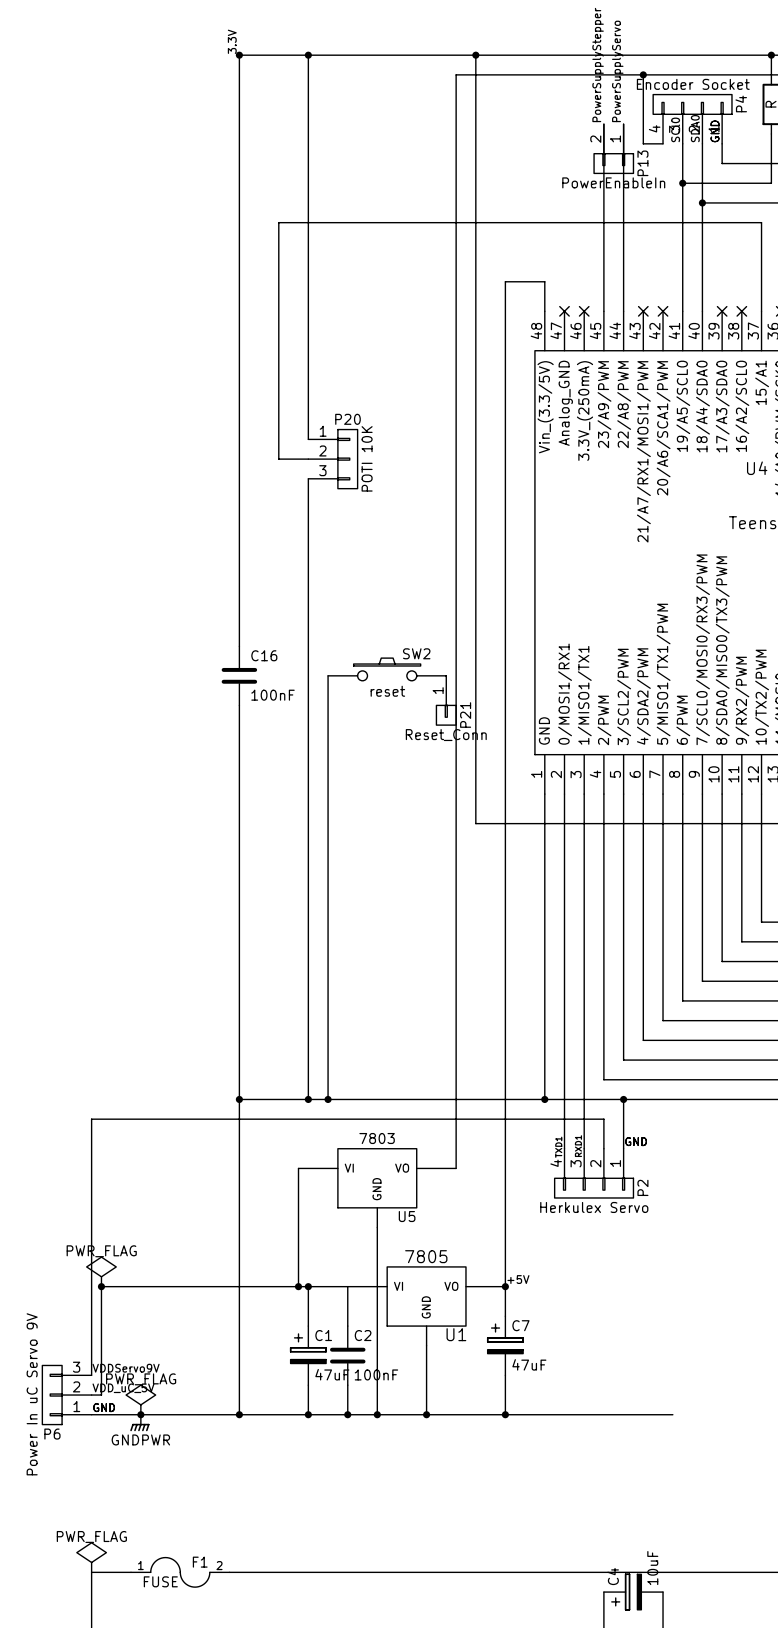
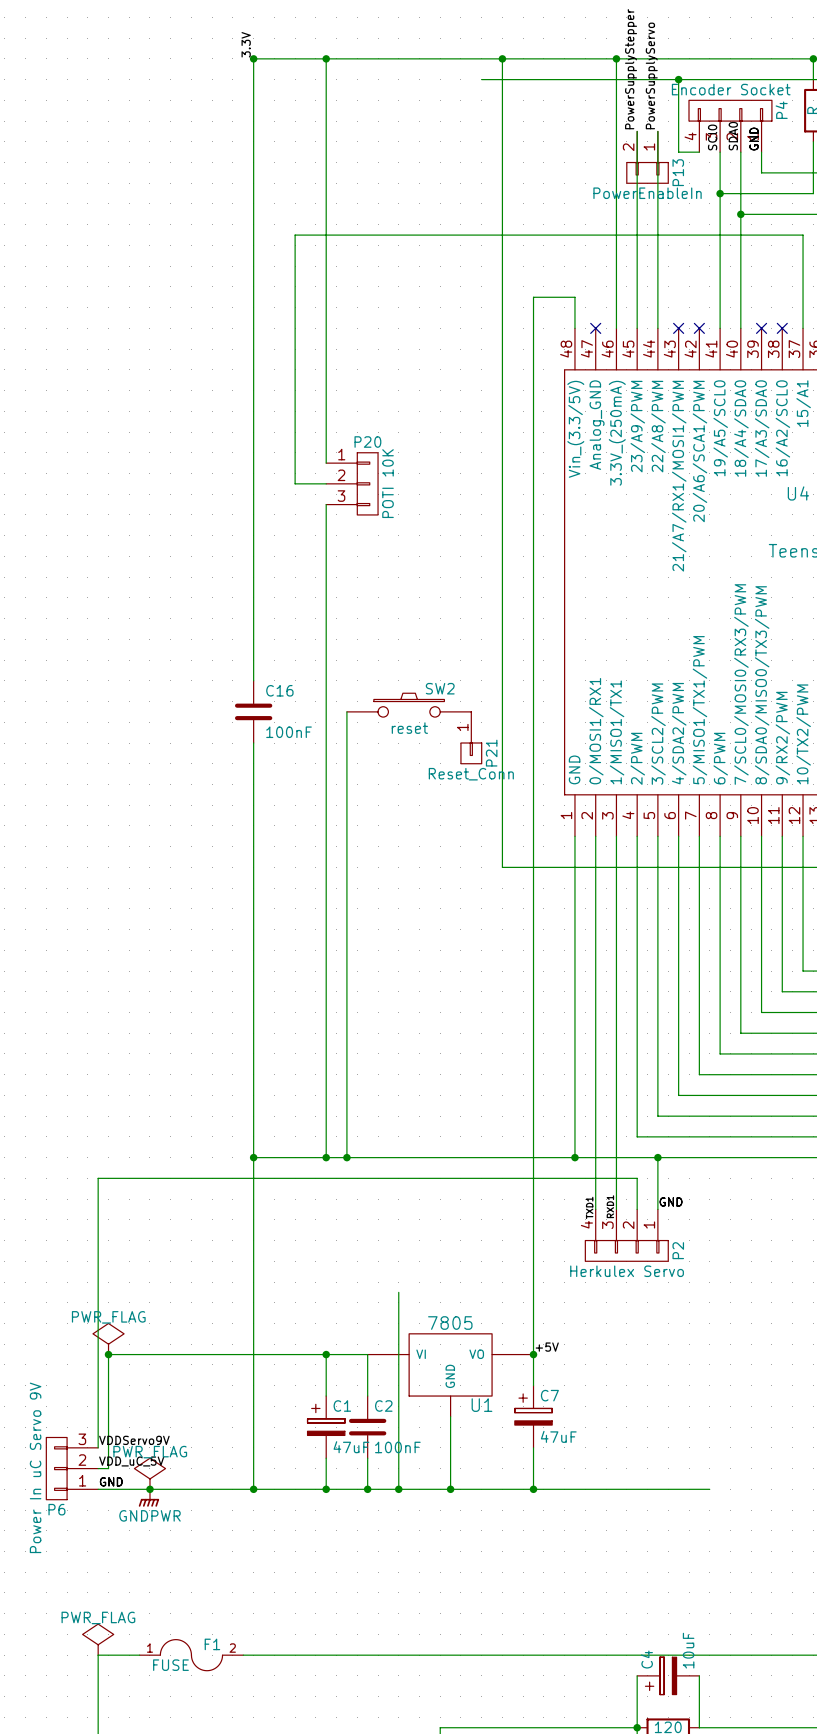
wire: none -> (616, 58) (616, 328)
junction: none -> (616, 58)
wire: (456, 74) (456, 1168) -> none
no-connect mark: (584, 311) -> none
wire: (298, 1168) (298, 1286) -> none
U5: 7803 (377, 1188) -> none
junction: (298, 1286) -> none

